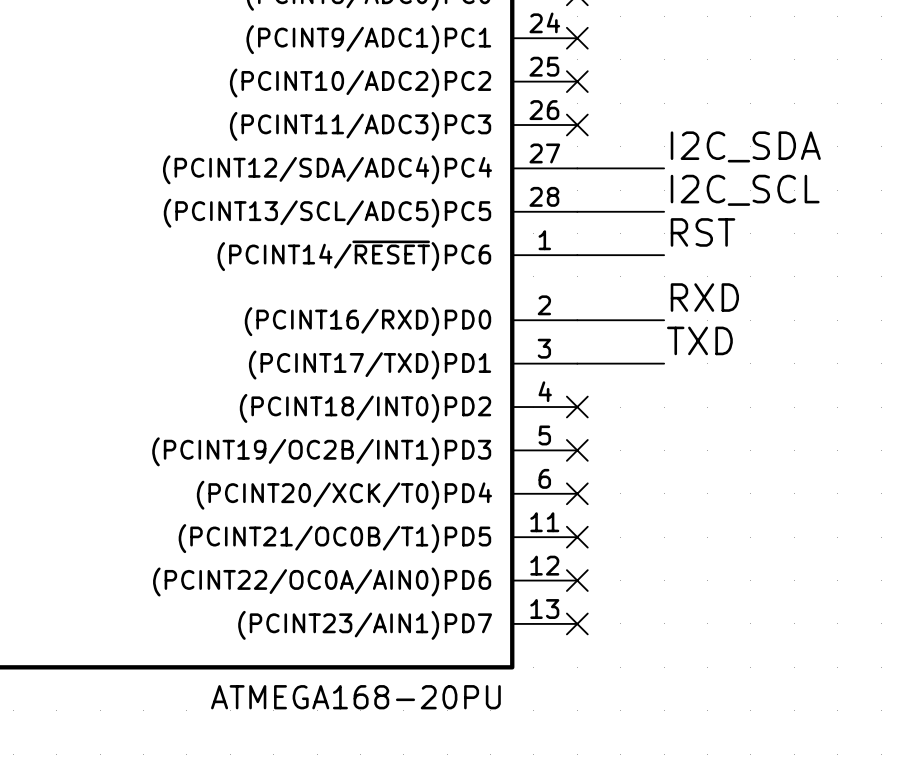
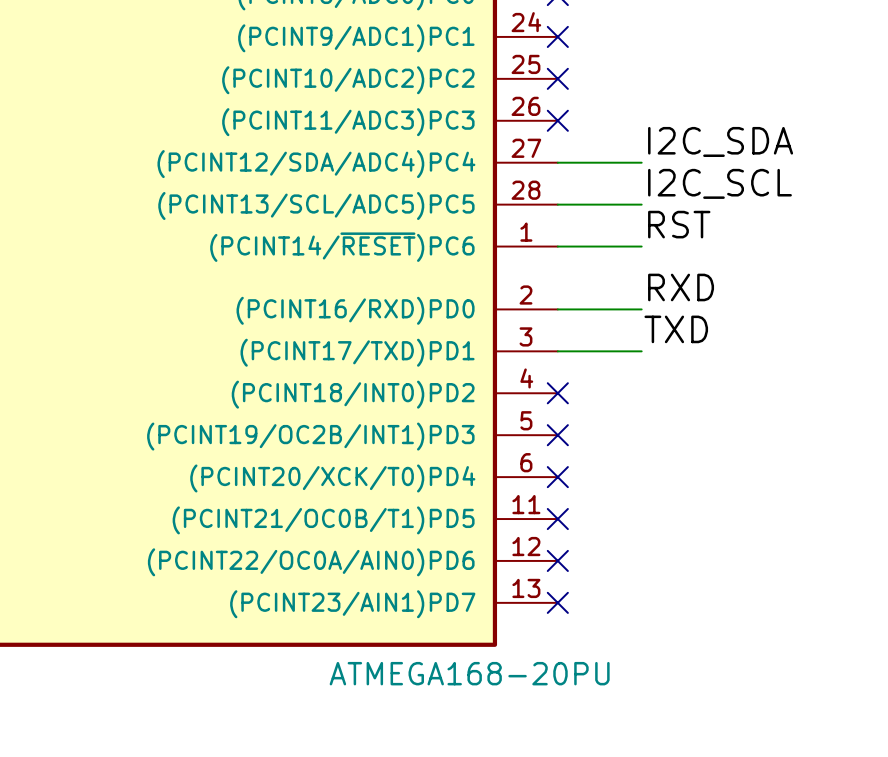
part value position: ATMEGA168-20PU (355, 697) -> ATMEGA168-20PU (469, 673)

